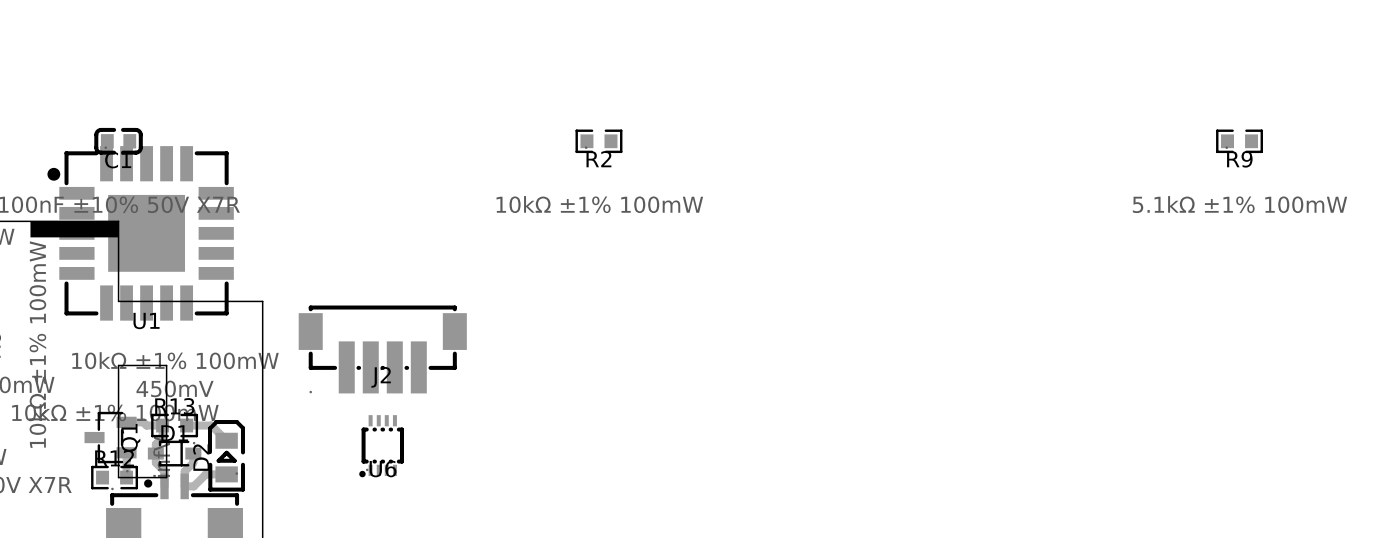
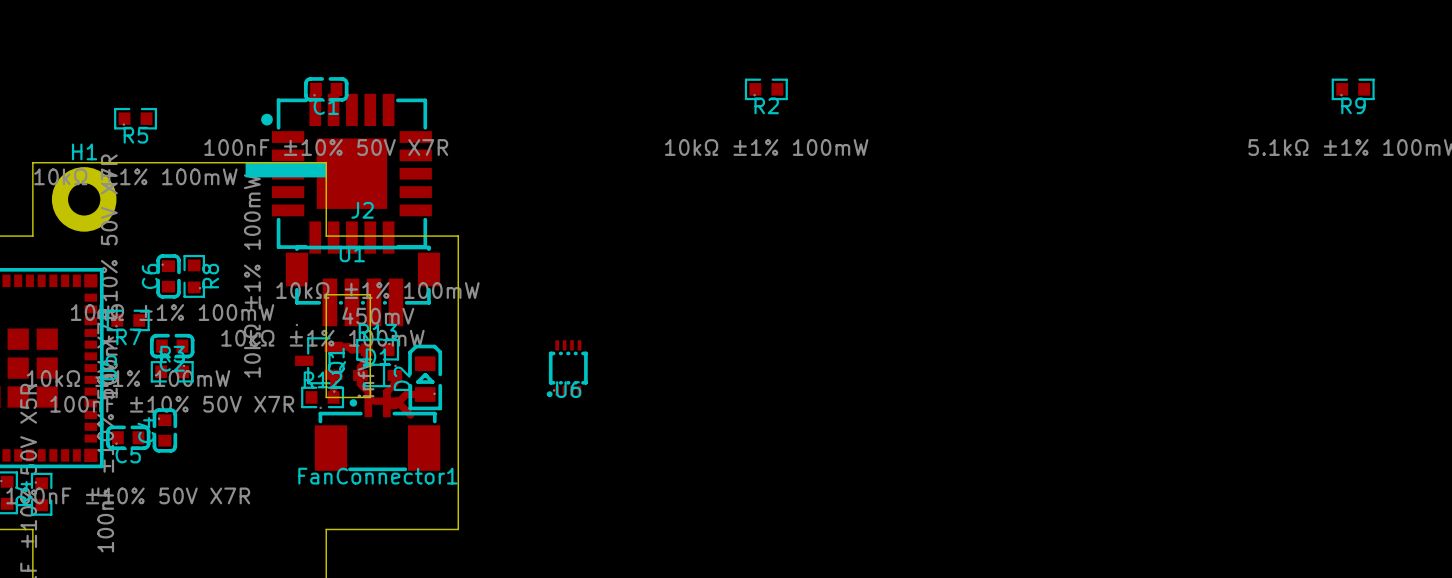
J2 position: (382, 349) -> (362, 285)
J2 name position: J2 (381, 377) -> J2 (362, 210)
track: (186, 425) (211, 425) (226, 440) -> (373, 401) (396, 401) (410, 415)

